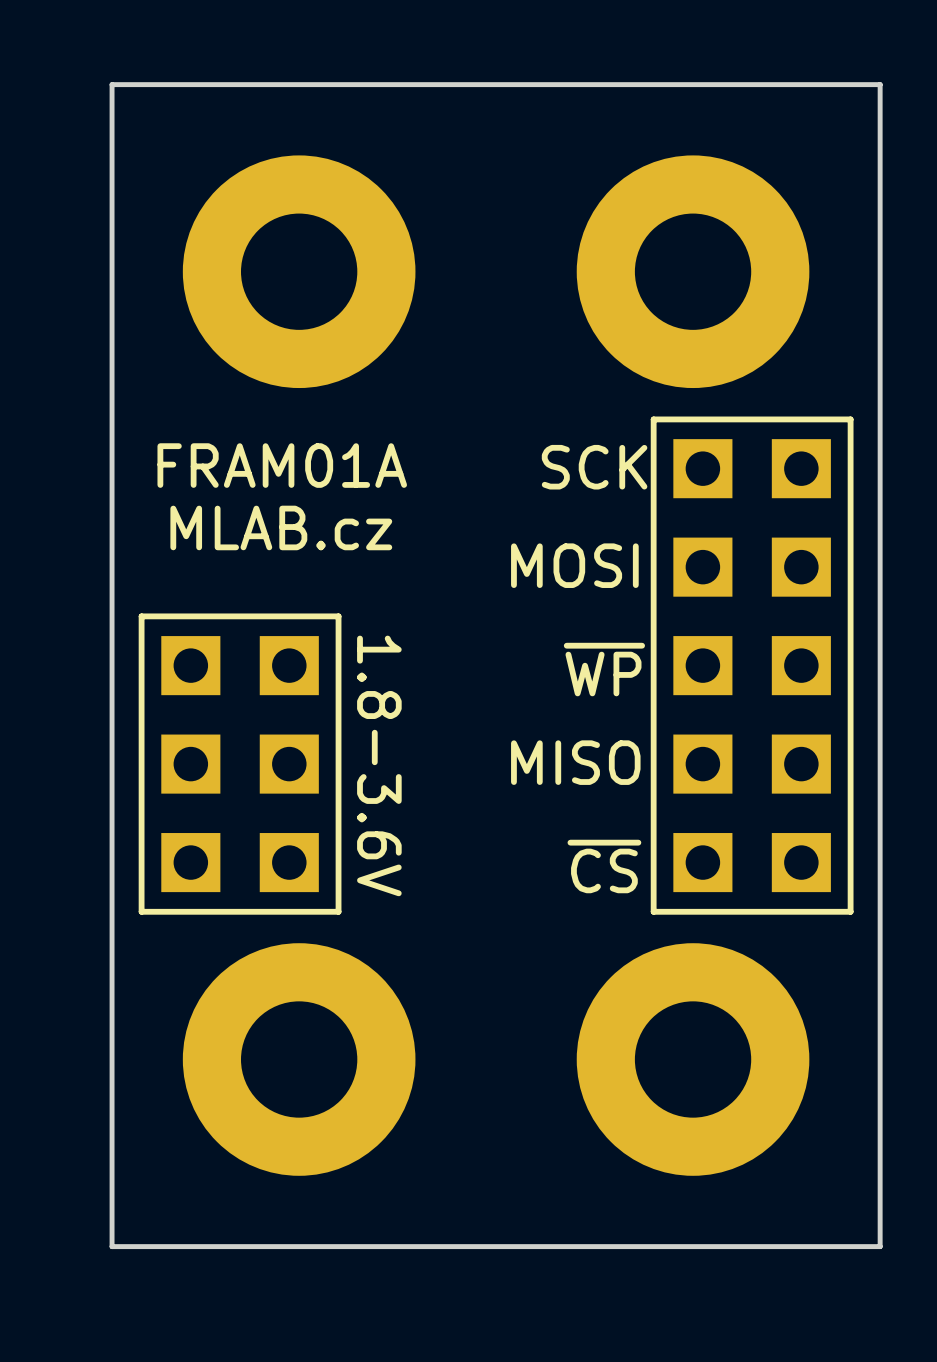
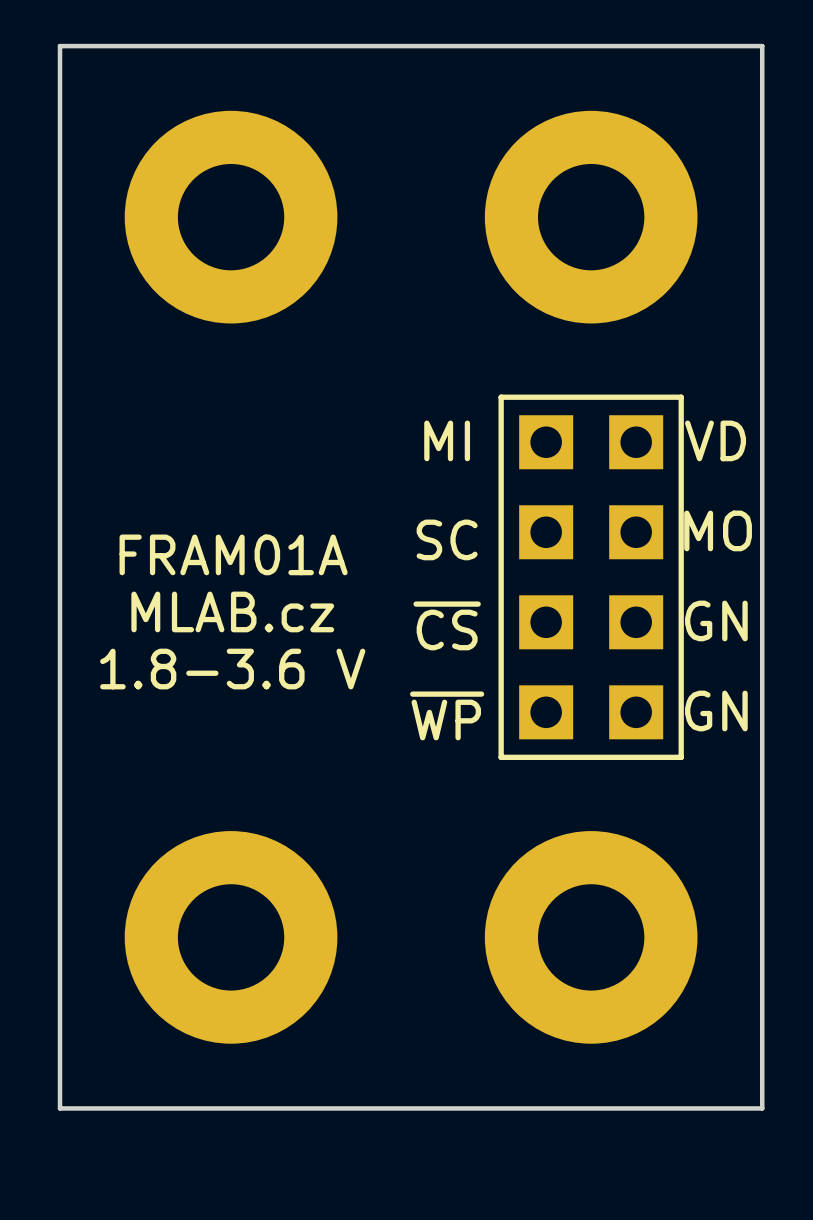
text position: FRAM01A (282, 465) -> FRAM01A (233, 554)
text: SCK (594, 467) -> none
text: none -> VD (715, 440)
text position: MLAB.cz (281, 527) -> MLAB.cz (232, 611)
text: MOSI (574, 565) -> MI (447, 440)
text: none -> MO (718, 530)
text: none -> SC (447, 539)
part: none -> (591, 577)
part: (752, 665) -> none
text position: ~{WP} (604, 669) -> ~{WP} (447, 715)
text: none -> GN (716, 620)
text: MISO (575, 762) -> none
part: (240, 764) -> none
text: 1.8-3.6V (379, 765) -> 1.8-3.6 V (232, 669)
text: none -> GN (716, 710)
text position: ~{CS} (604, 866) -> ~{CS} (447, 625)

